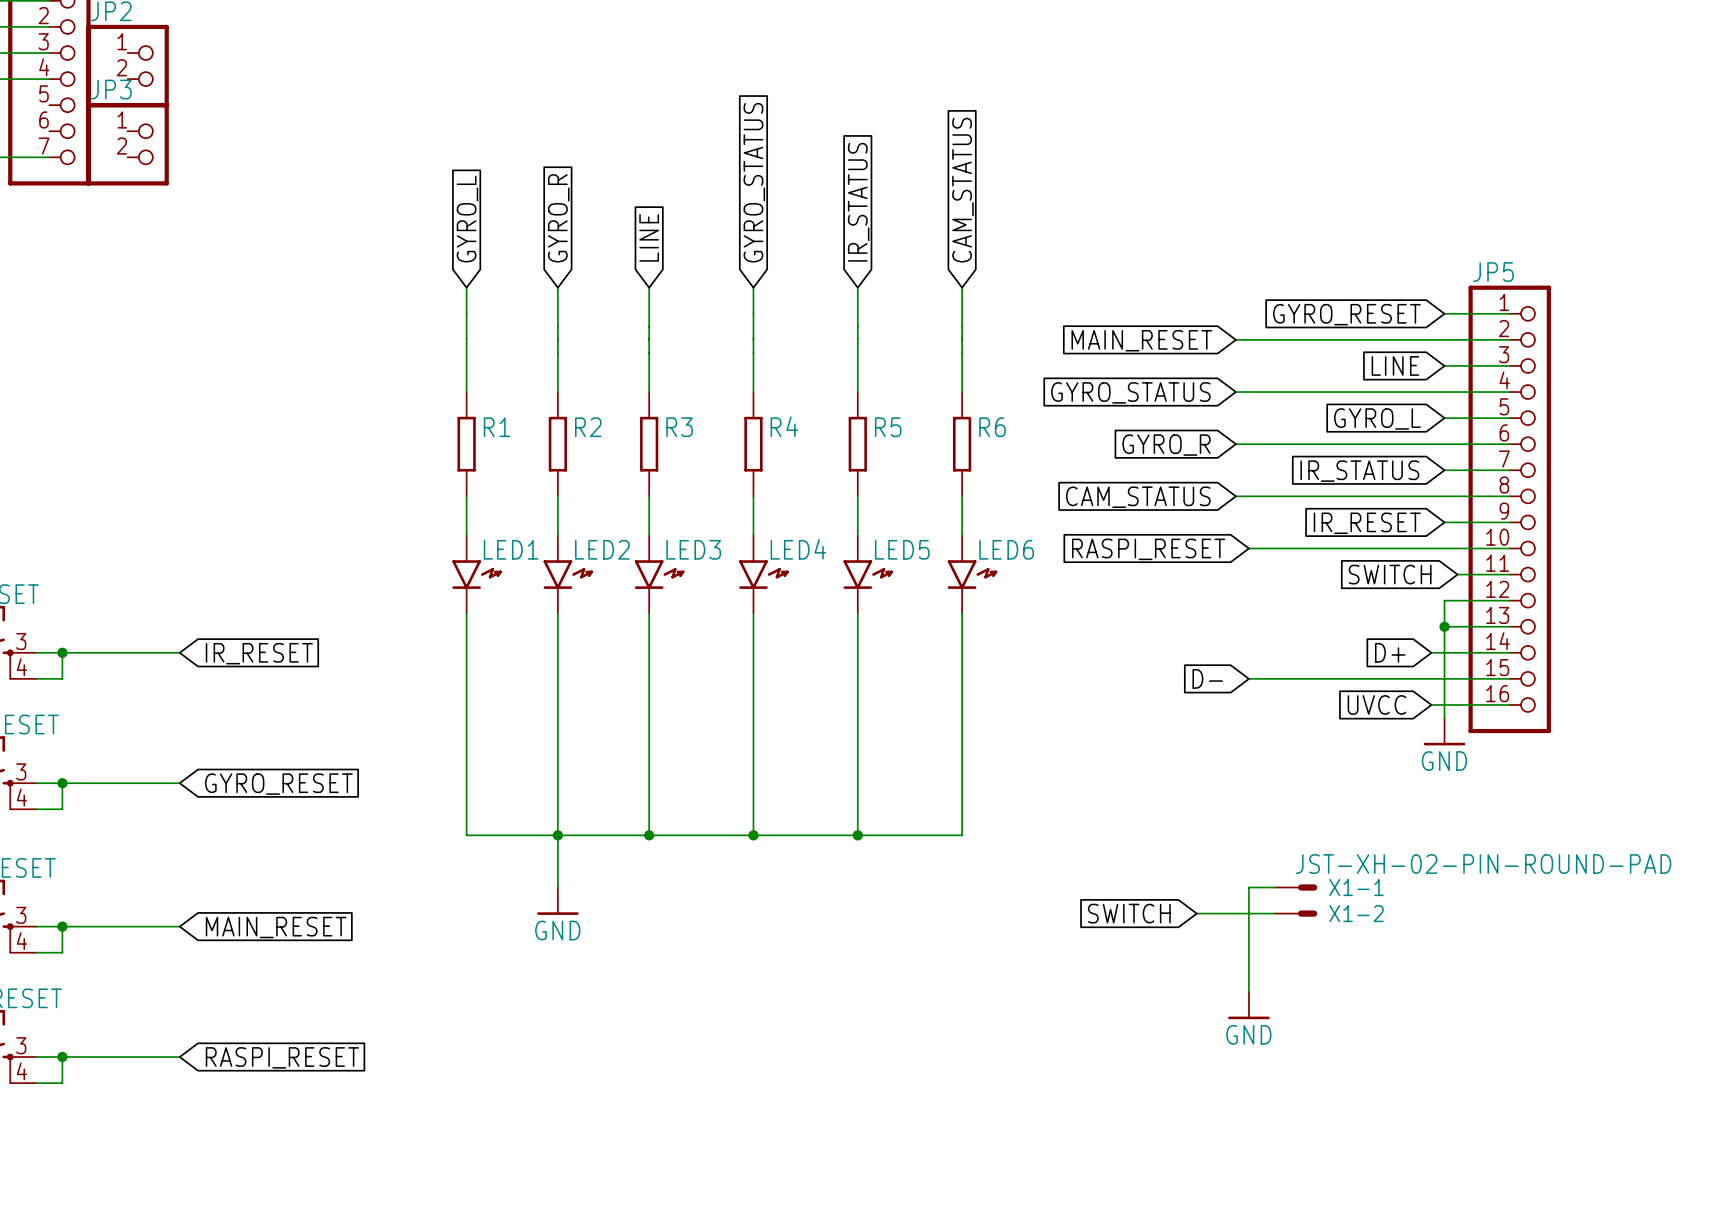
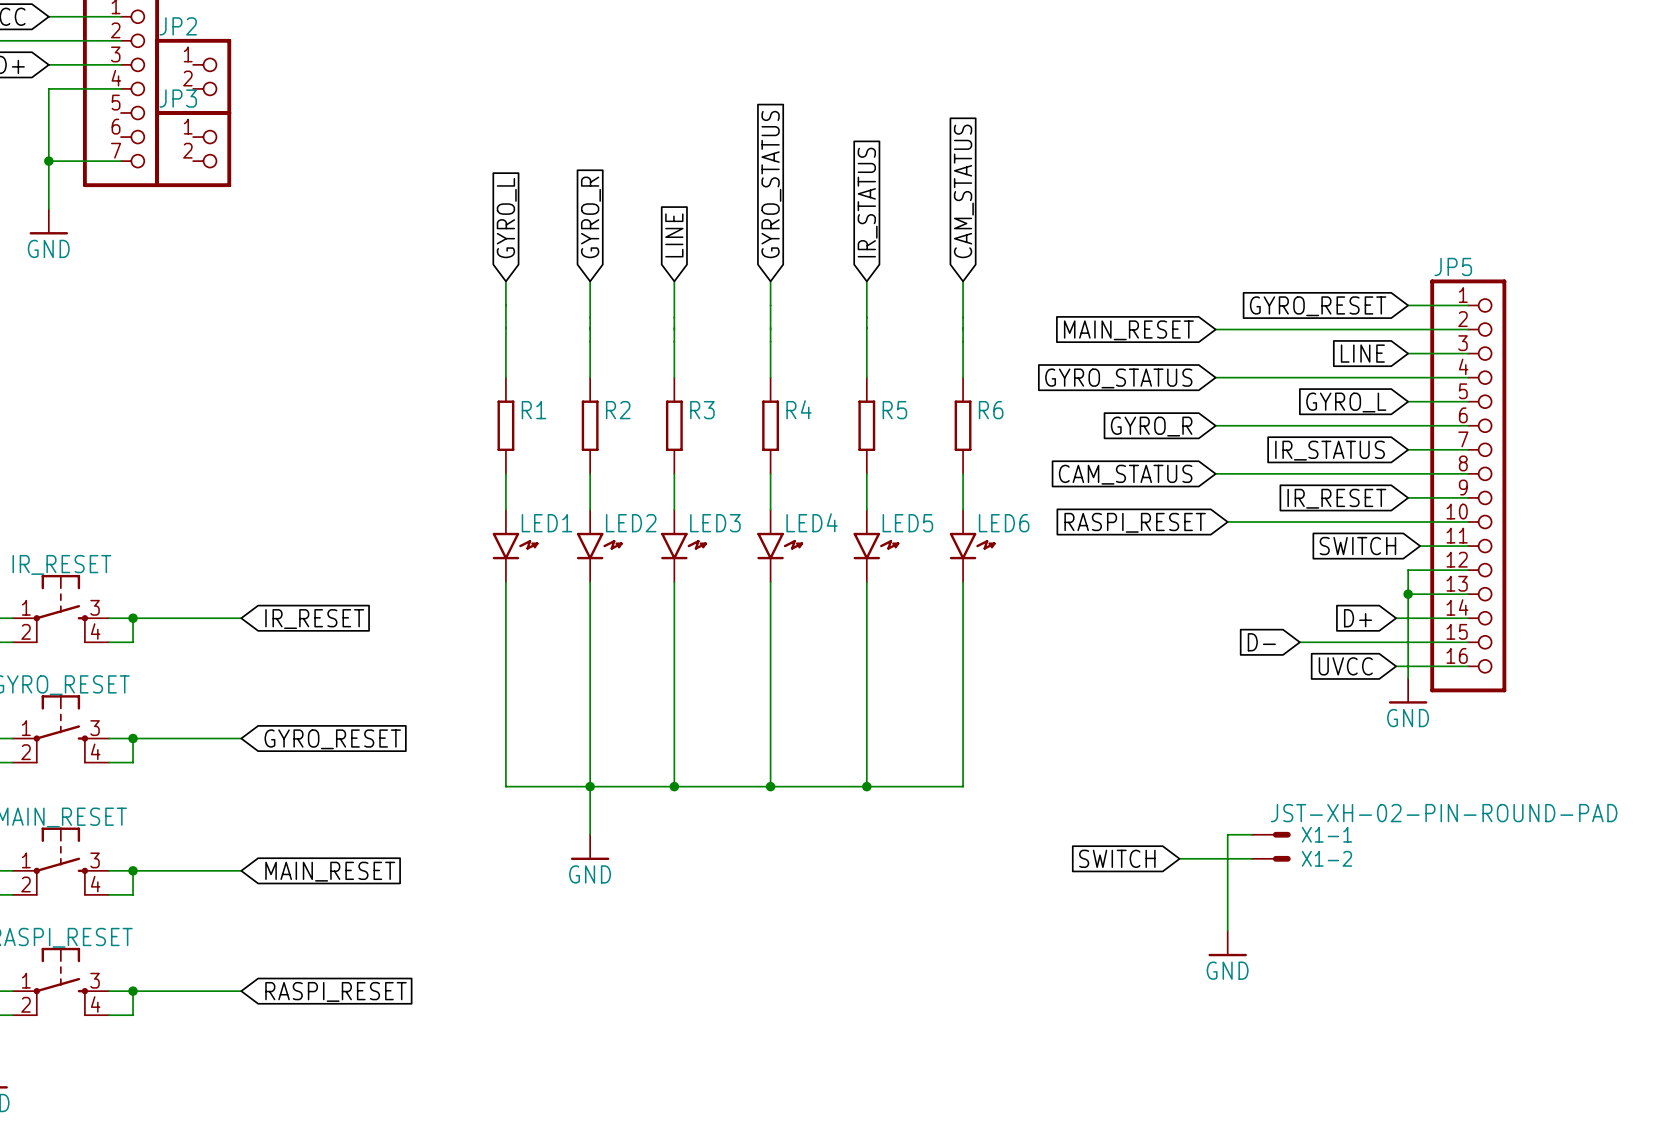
global label position: D- (1207, 678) -> D- (1261, 642)
wire: (1248, 678) (1327, 678) -> none

